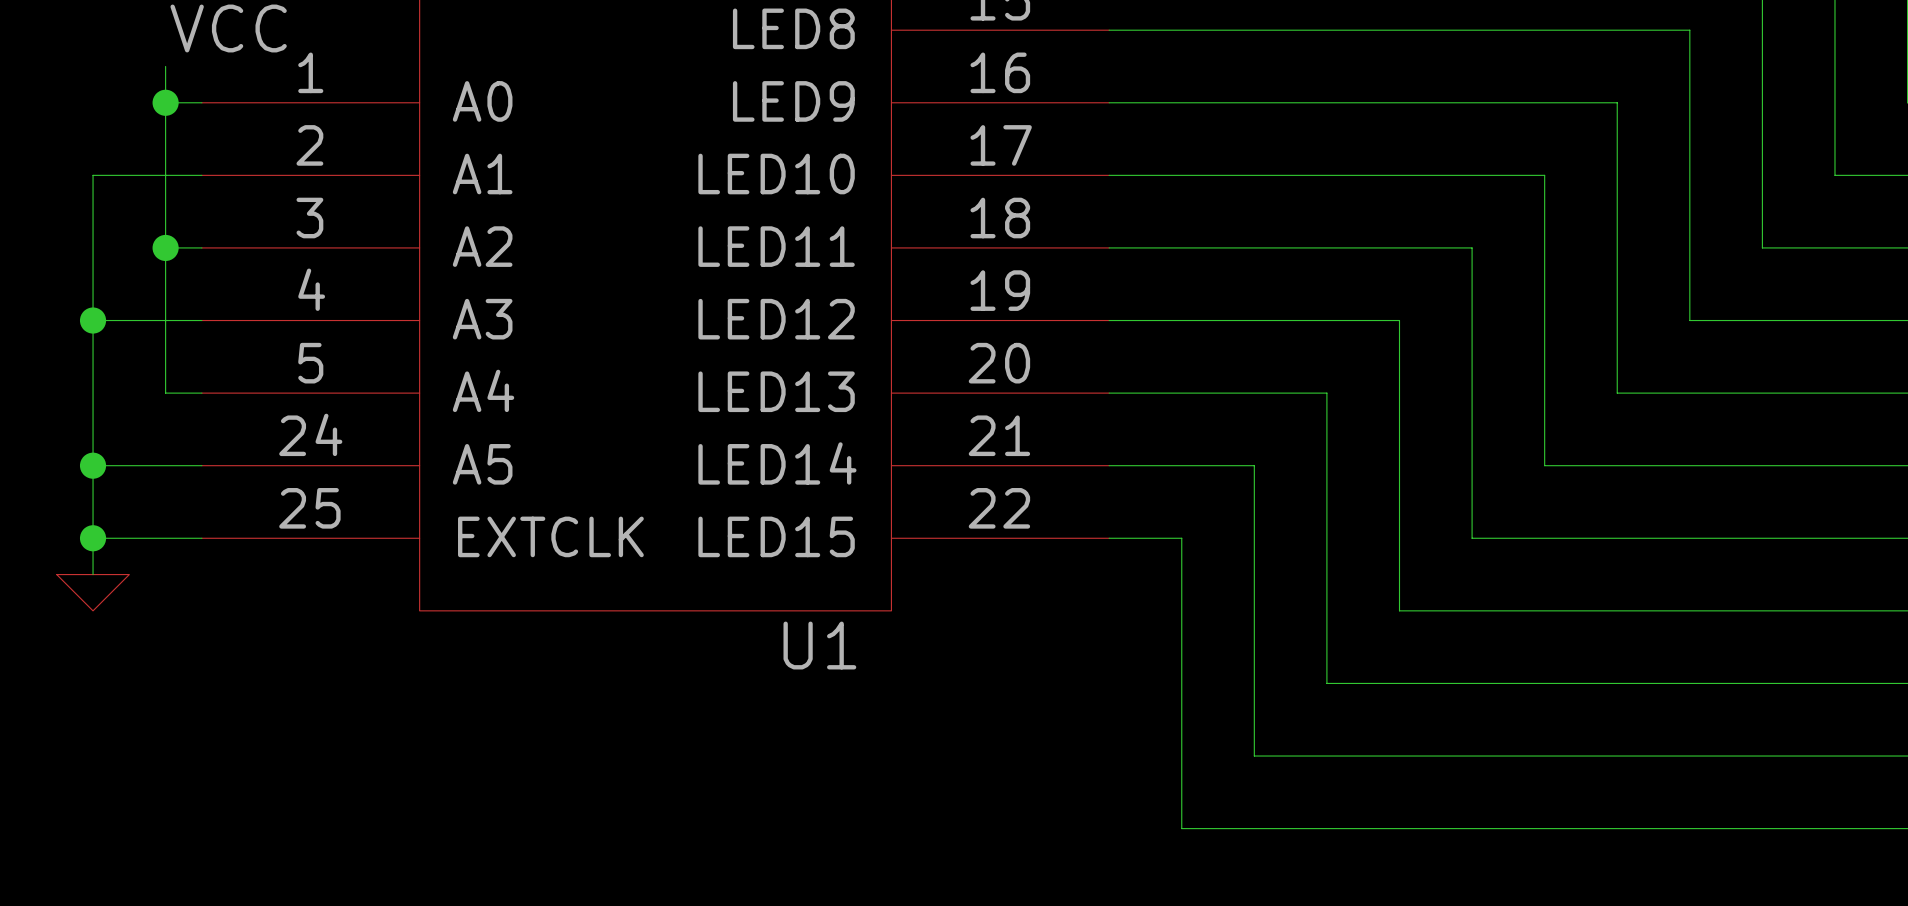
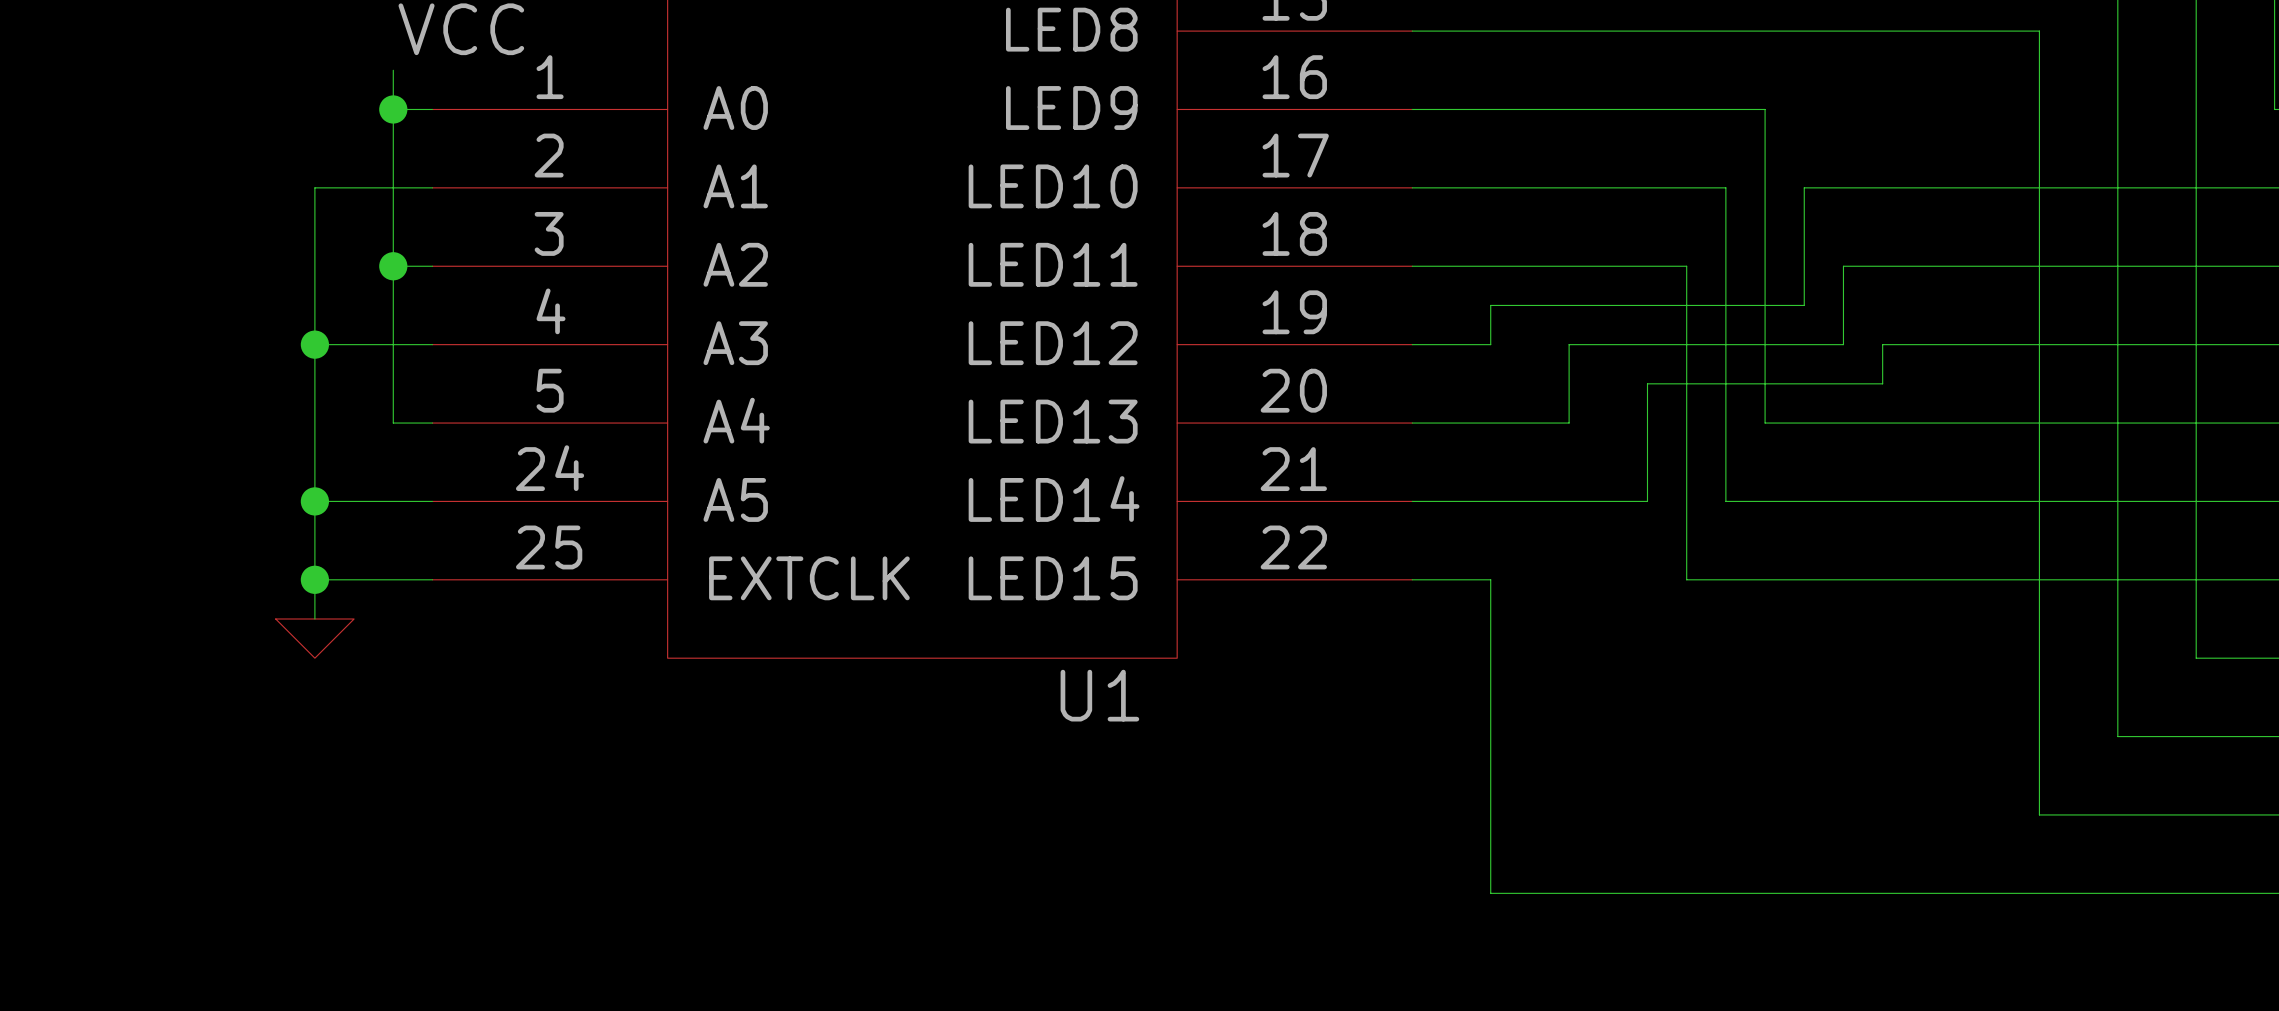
wire: (1435, 102) (1617, 102) (1617, 393) -> (1765, 109) (1765, 423) (1961, 423)
wire: (1399, 175) (1472, 175) -> (1804, 266) (1804, 187)
wire: (1544, 175) (1544, 320) -> none
wire: (1363, 247) (1472, 247) -> none
wire: (1472, 284) (1472, 538) -> (1686, 266) (1686, 579) (1804, 579)
wire: (1181, 320) (1254, 320) -> (1490, 344) (1490, 305) (1804, 305)
wire: (1544, 356) (1544, 465) -> (1725, 501) (1882, 501)
wire: none -> (1882, 383) (1647, 383) (1647, 423)
wire: (1254, 393) (1326, 393) -> (1569, 423) (1569, 344)
wire: (1254, 465) (1254, 756) (1689, 756) -> (1882, 344) (2039, 344) (2039, 814)
wire: none -> (1569, 501) (1647, 501)
wire: (1326, 465) (1326, 683) (1762, 683) -> (1725, 187) (1725, 344) (1843, 344) (1843, 266) (2117, 266) (2117, 736)
wire: (1399, 465) (1399, 610) (1834, 610) -> (1882, 187) (2196, 187) (2196, 658)

